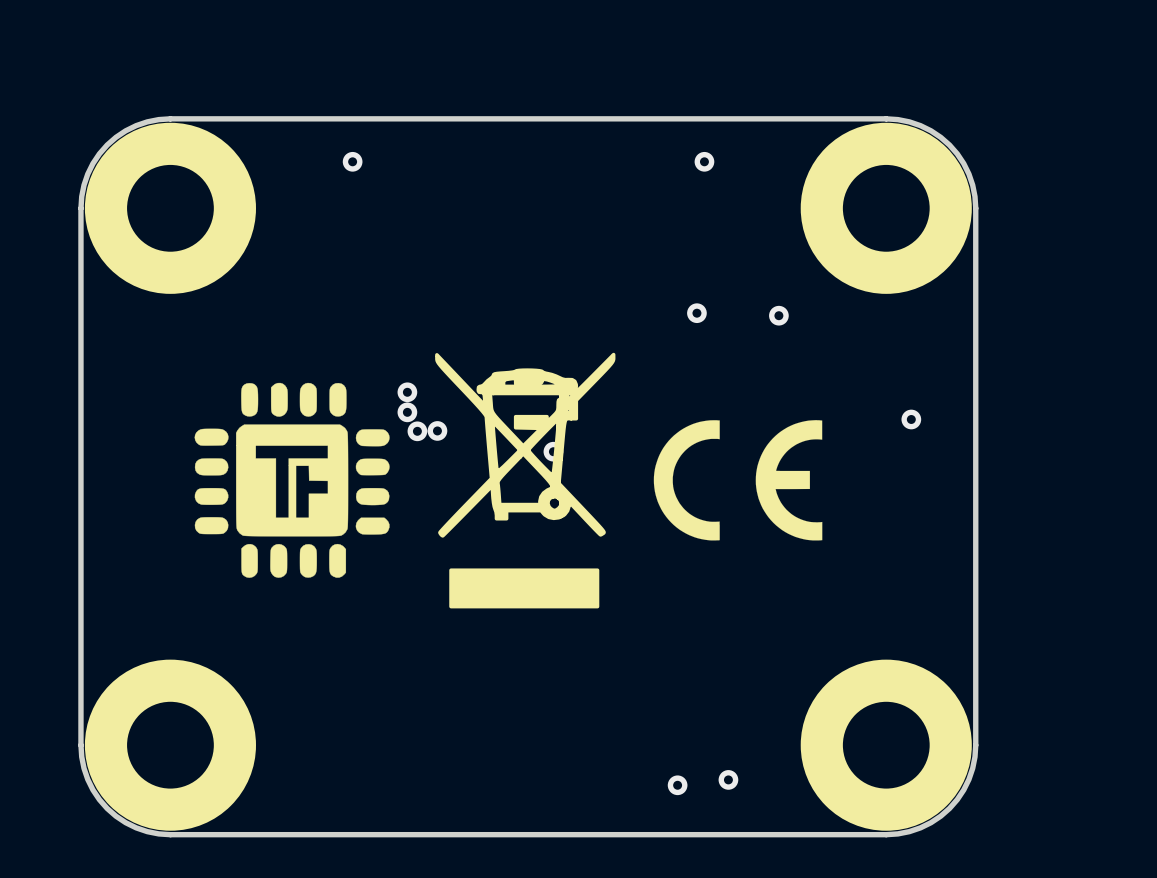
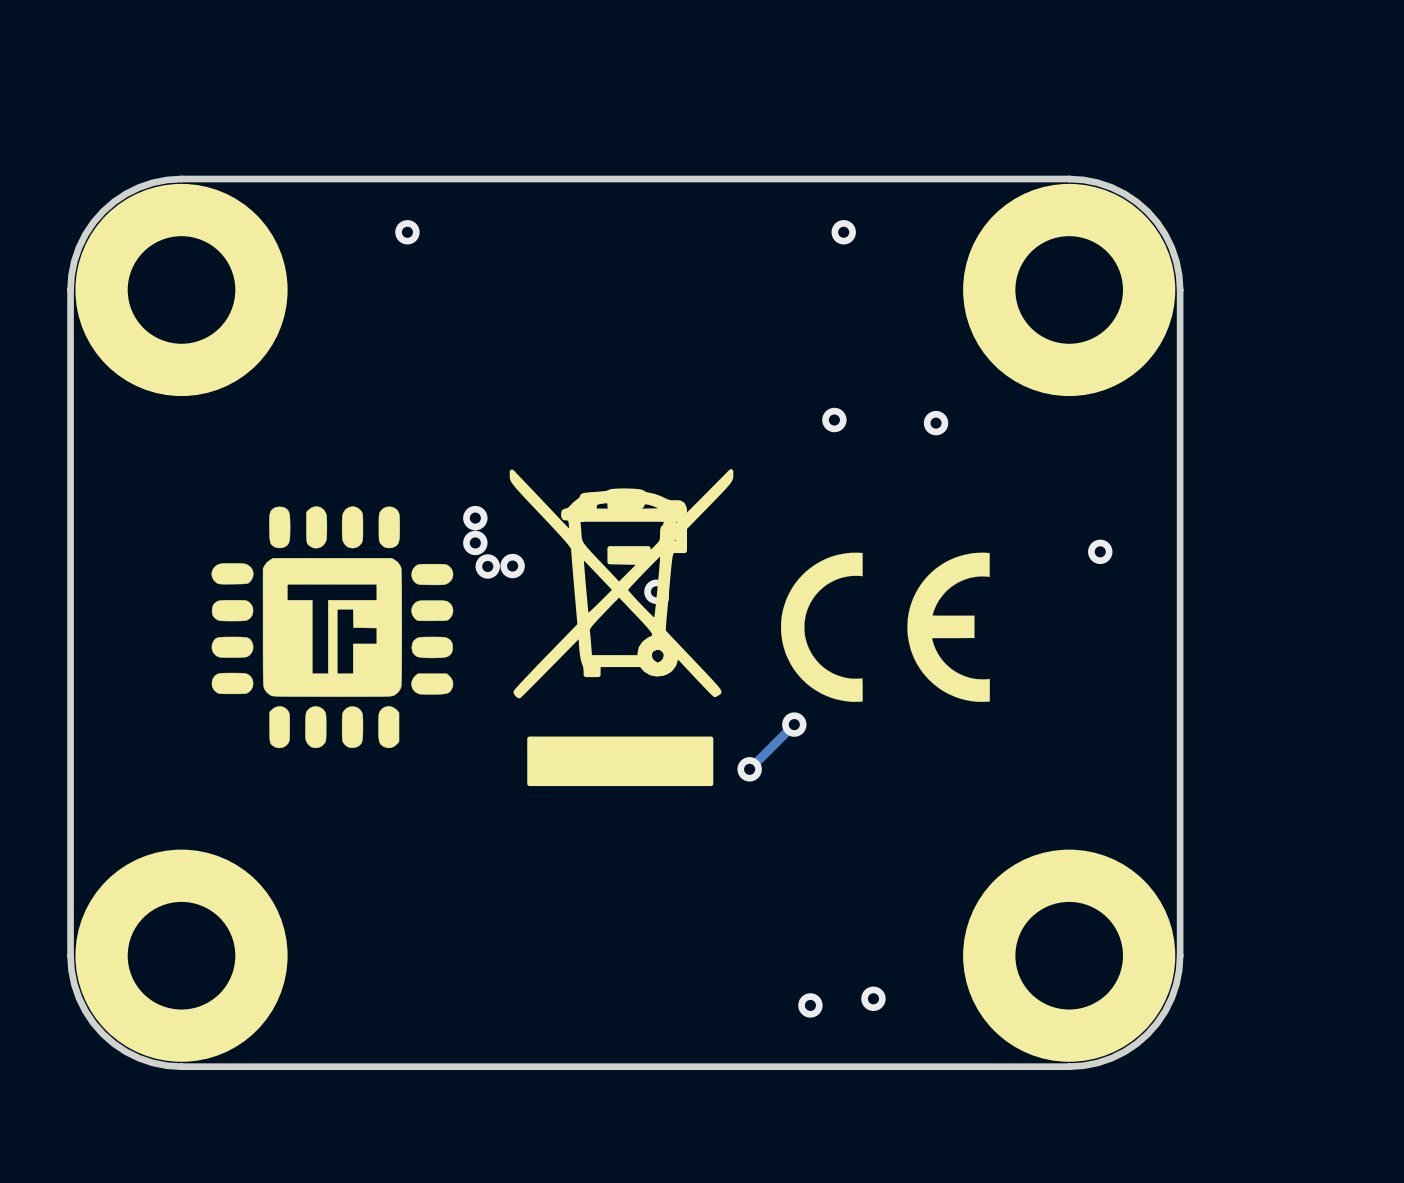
track: none -> (794, 724) (749, 769)
via: none -> (794, 724)
via: none -> (749, 769)

